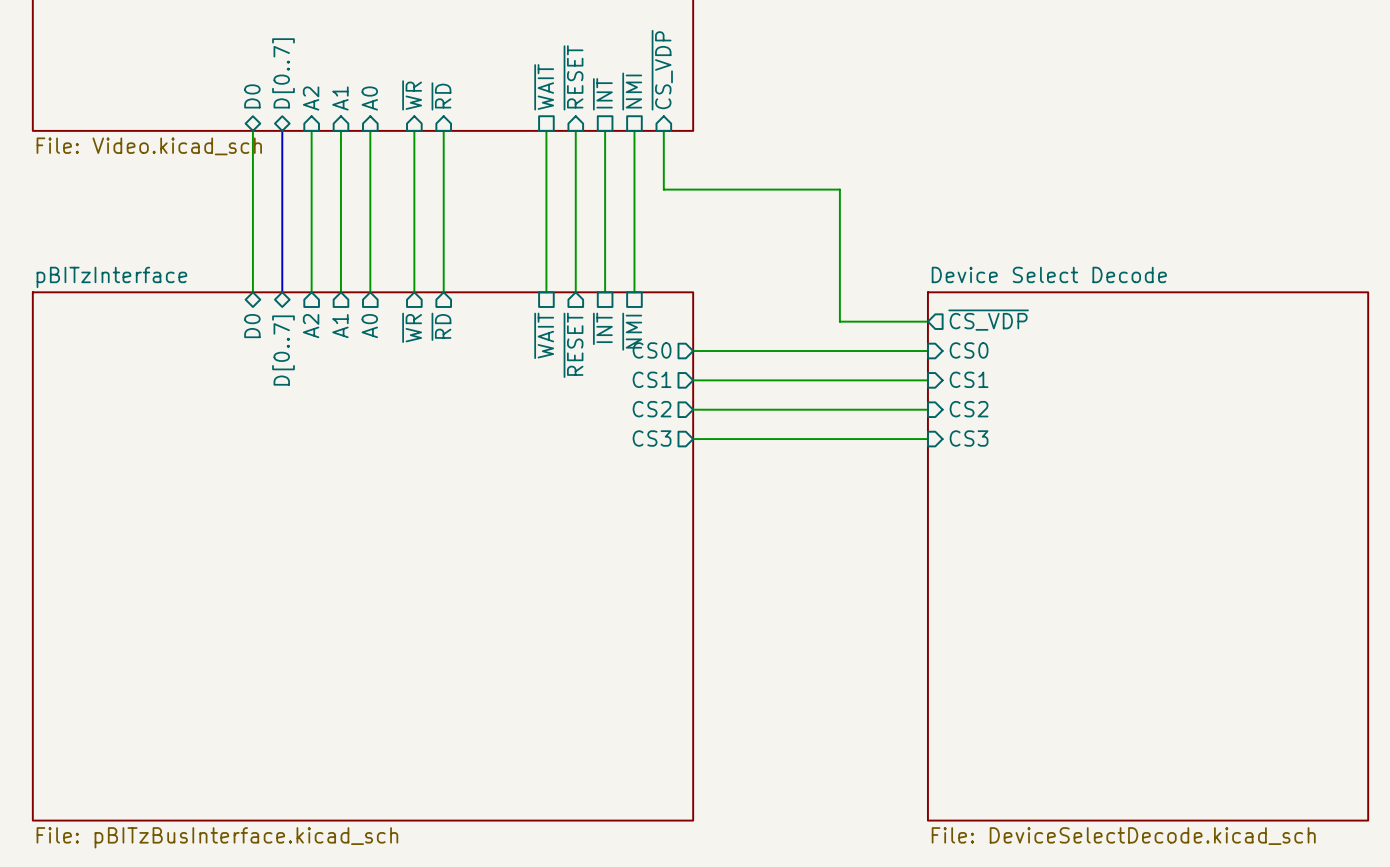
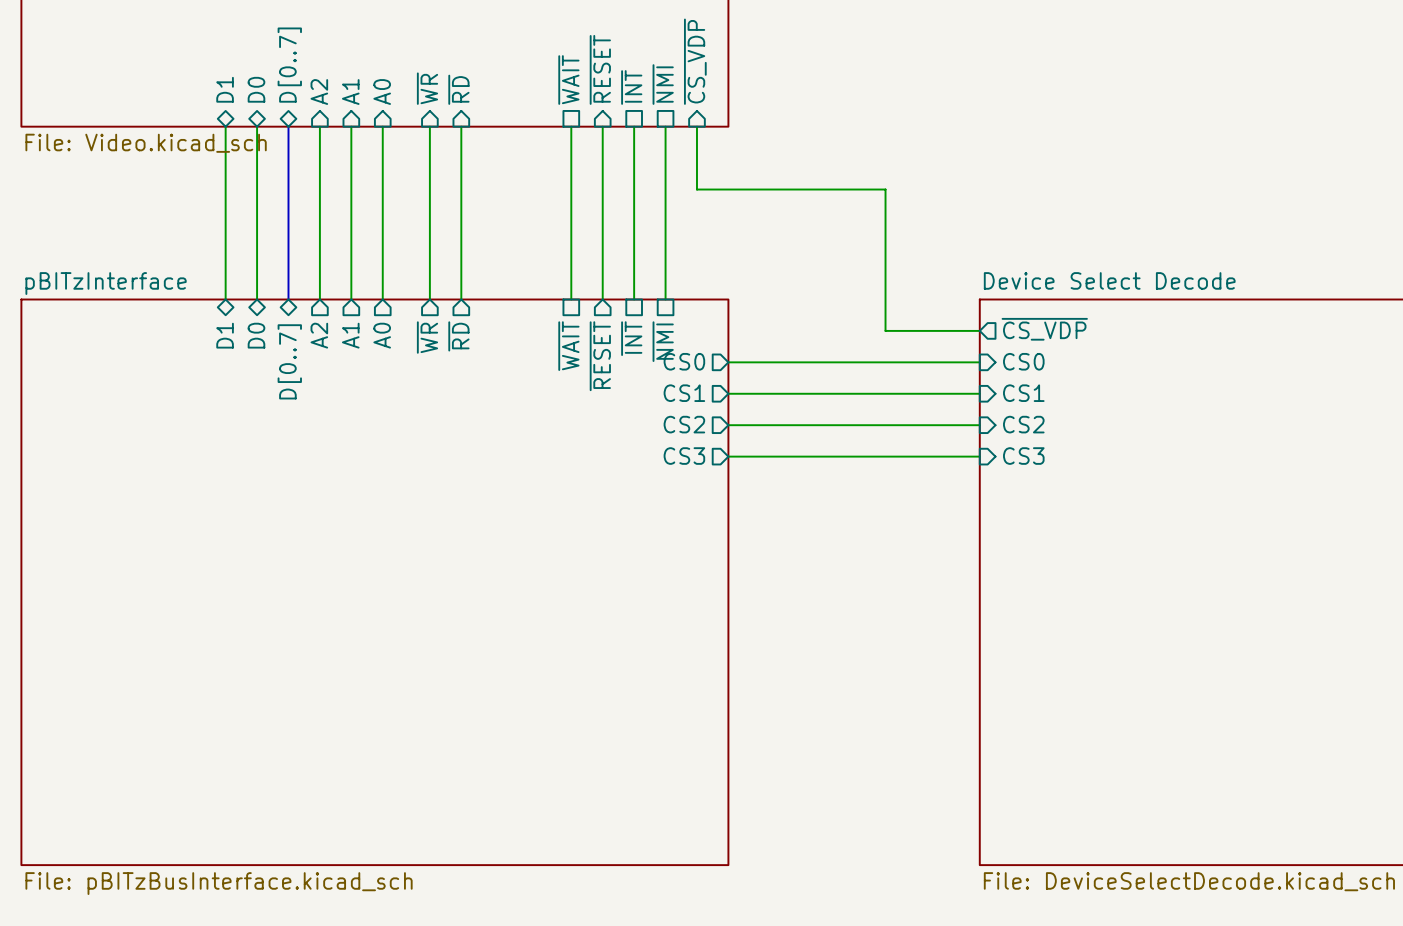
sheet pin: none -> D1 (225, 89)
wire: none -> (225, 126) (225, 299)
sheet pin: none -> D1 (225, 335)

